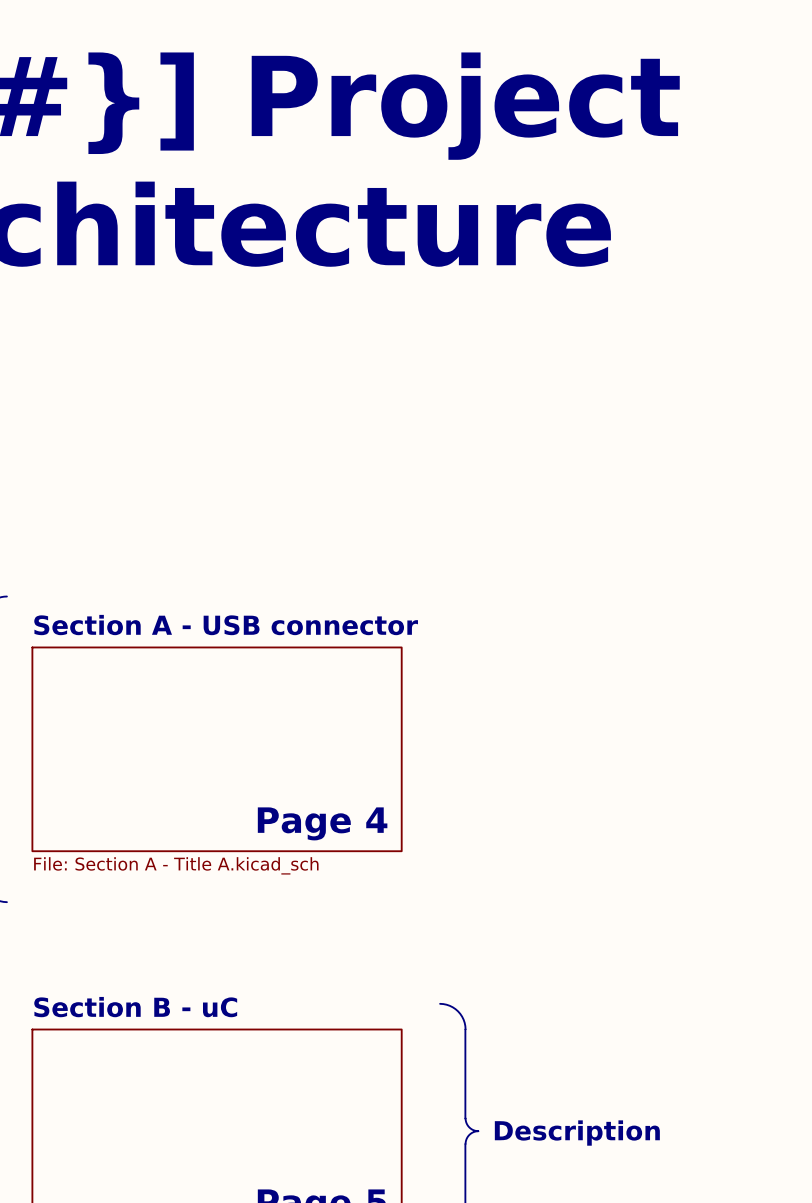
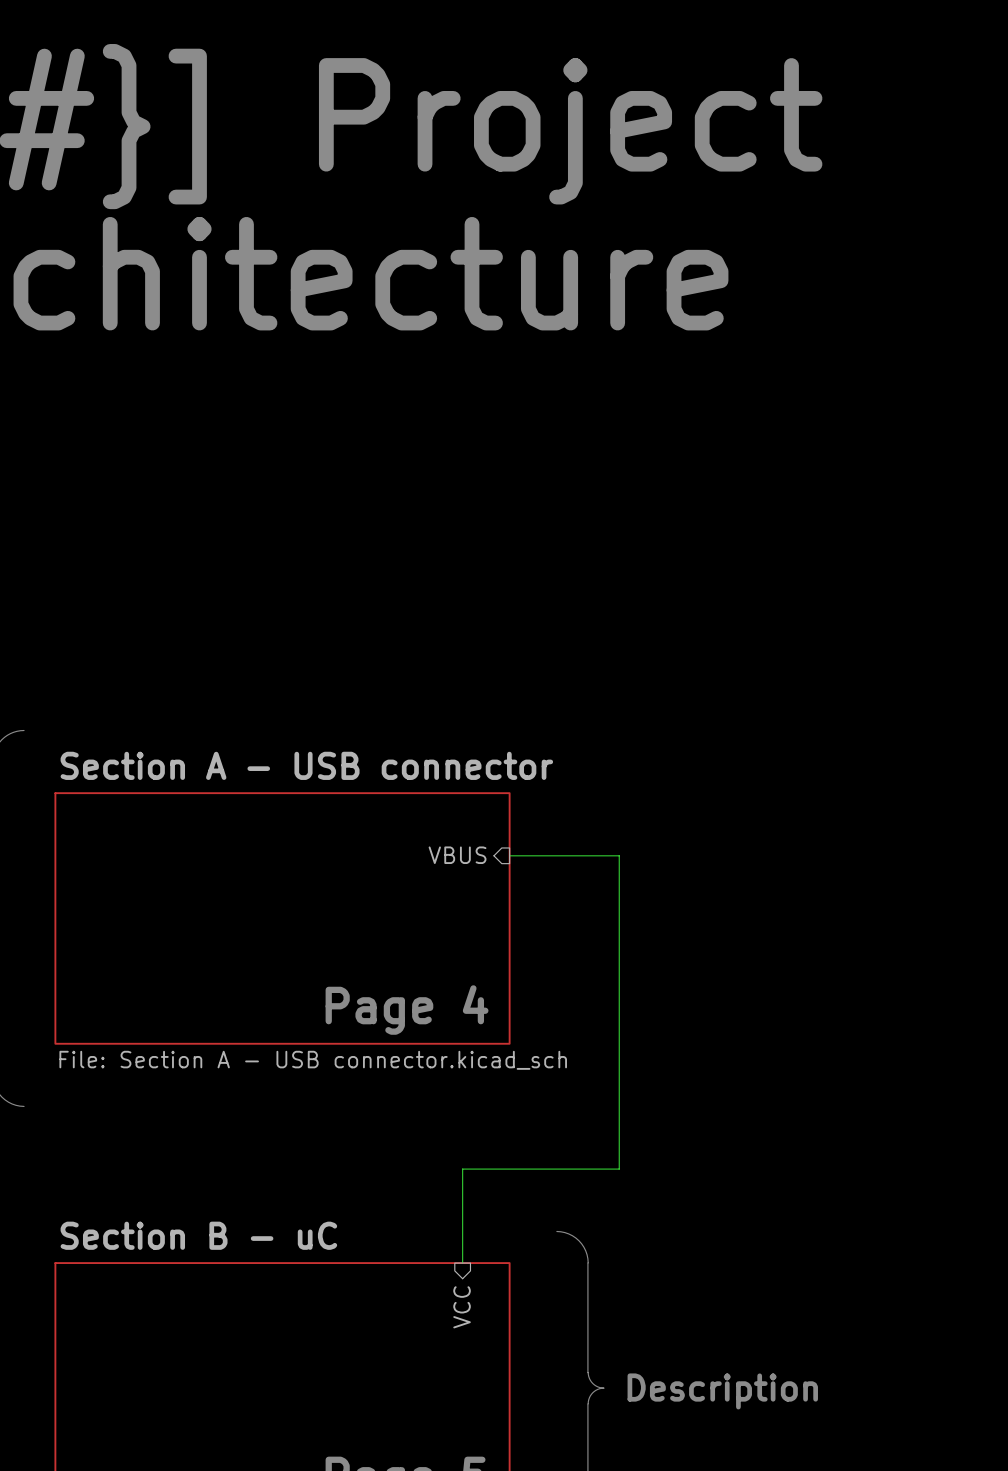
sheet pin: none -> VBUS (457, 855)
wire: none -> (509, 855) (619, 855) (619, 1169) (462, 1169) (462, 1263)
sheet Section A - USB connector value: File: Section A - Title A.kicad_sch (176, 865) -> File: Section A - USB connector.kicad_sch (313, 1060)
sheet pin: none -> VCC (462, 1307)

